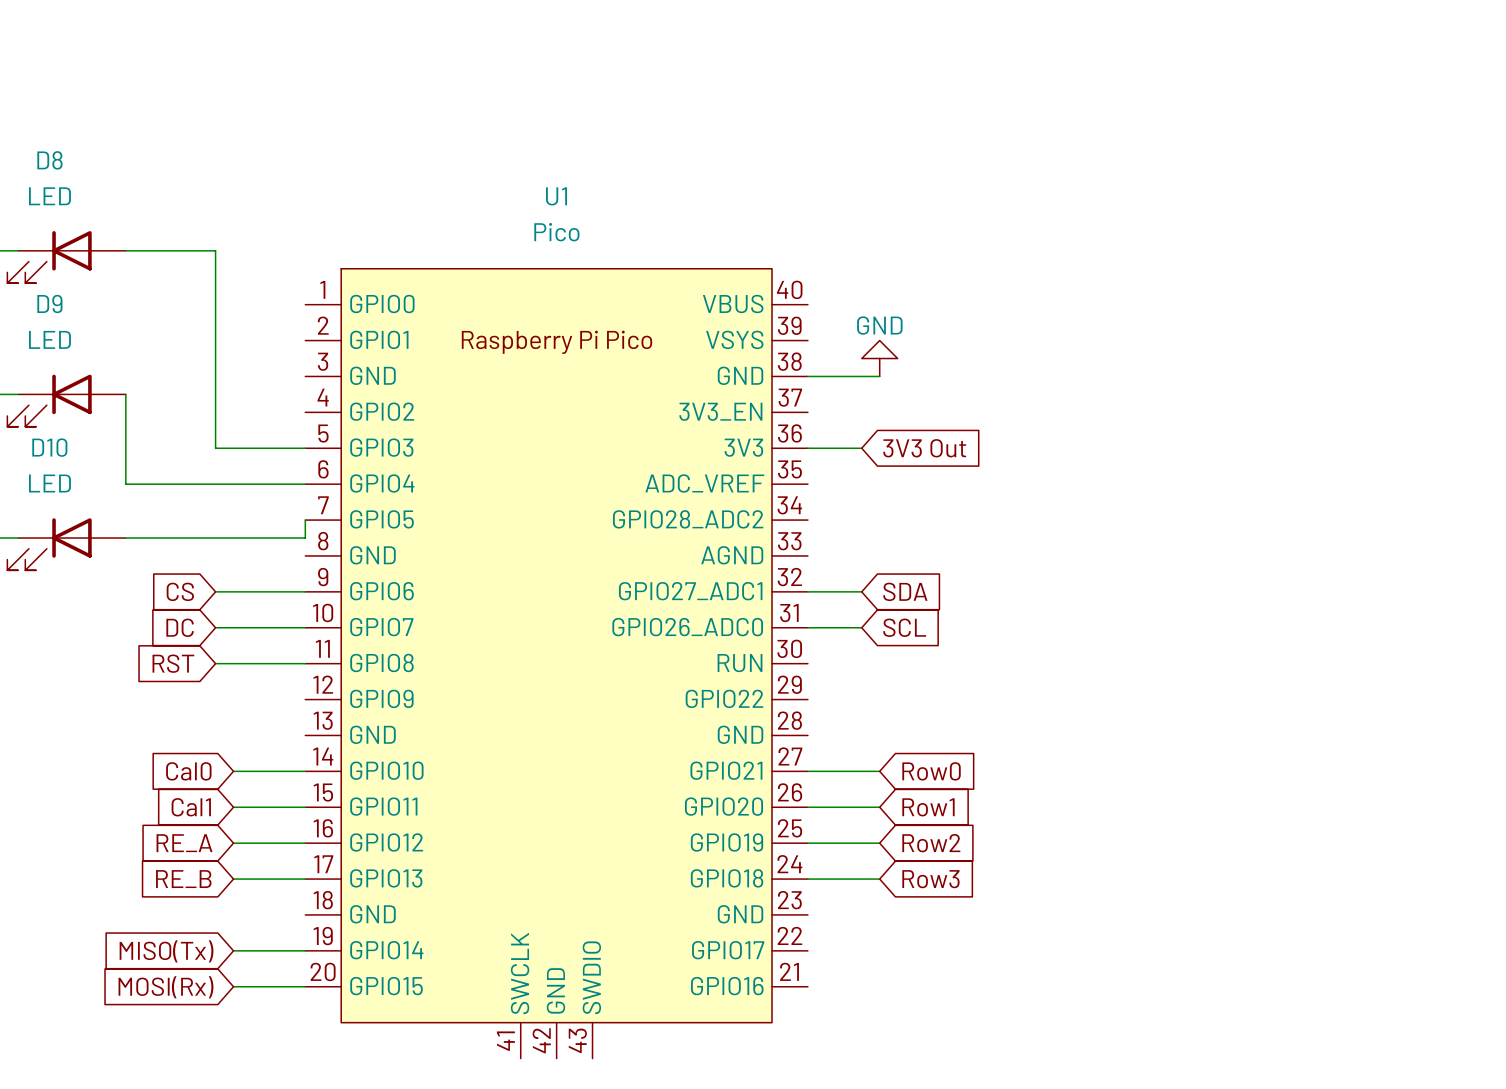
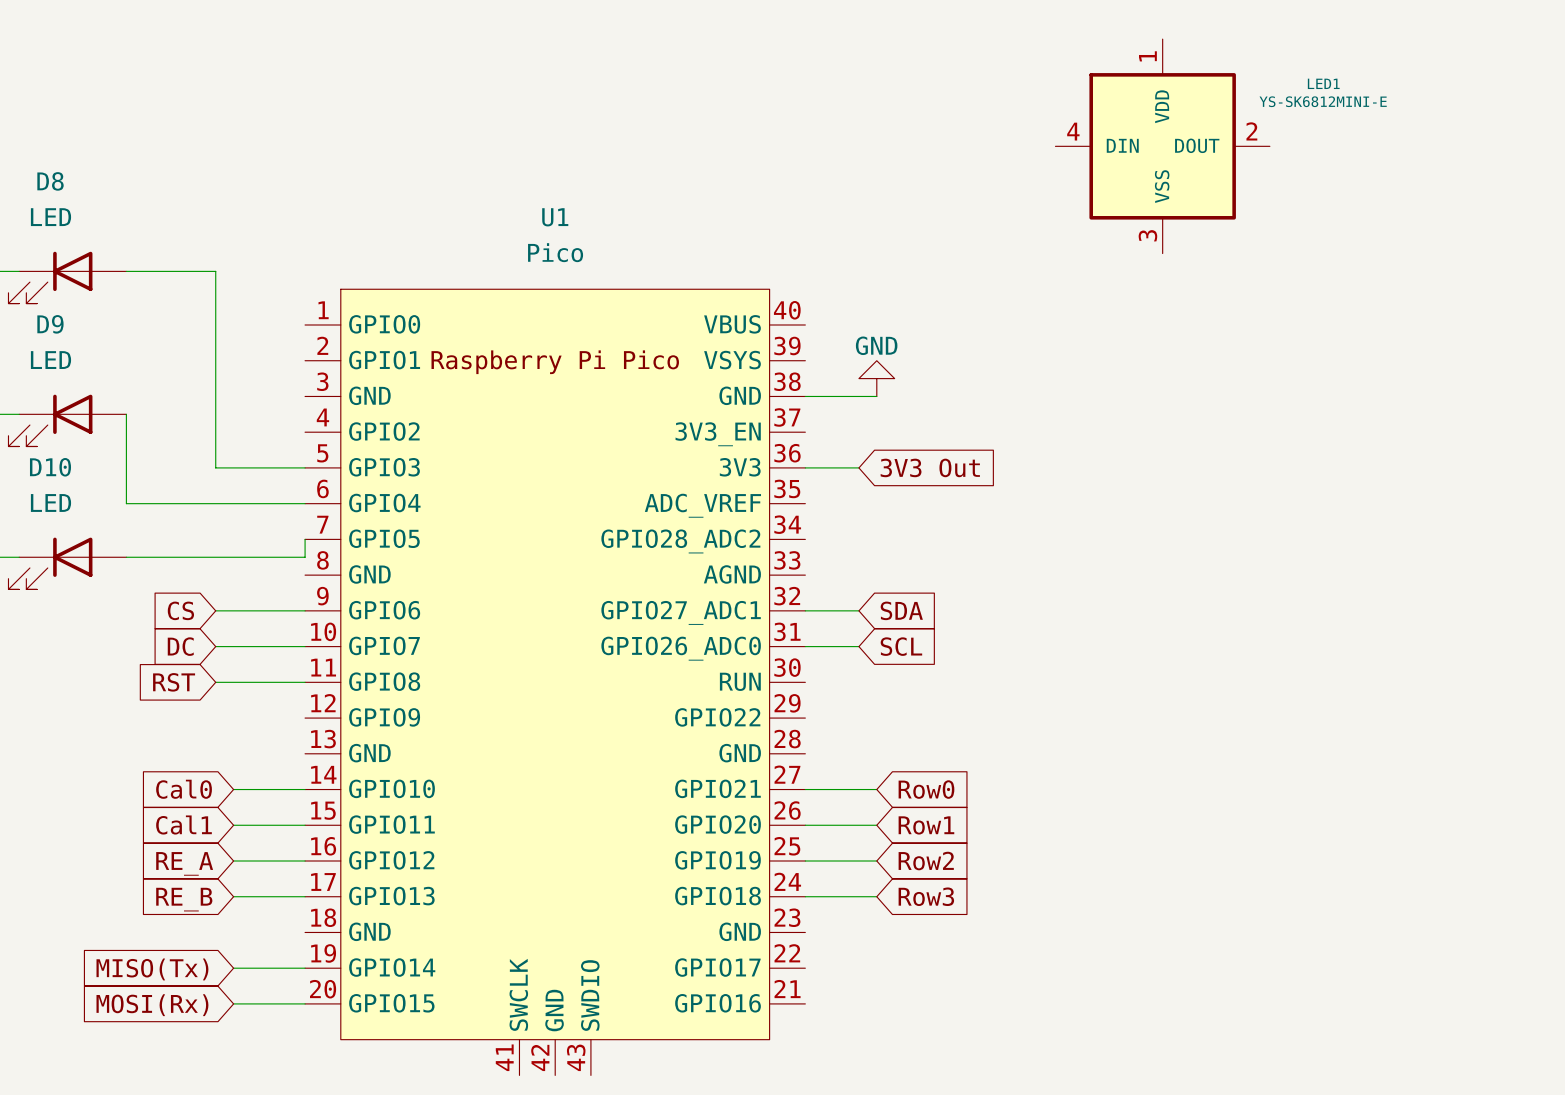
LED1: none -> YS-SK6812MINI-E (1162, 146)

